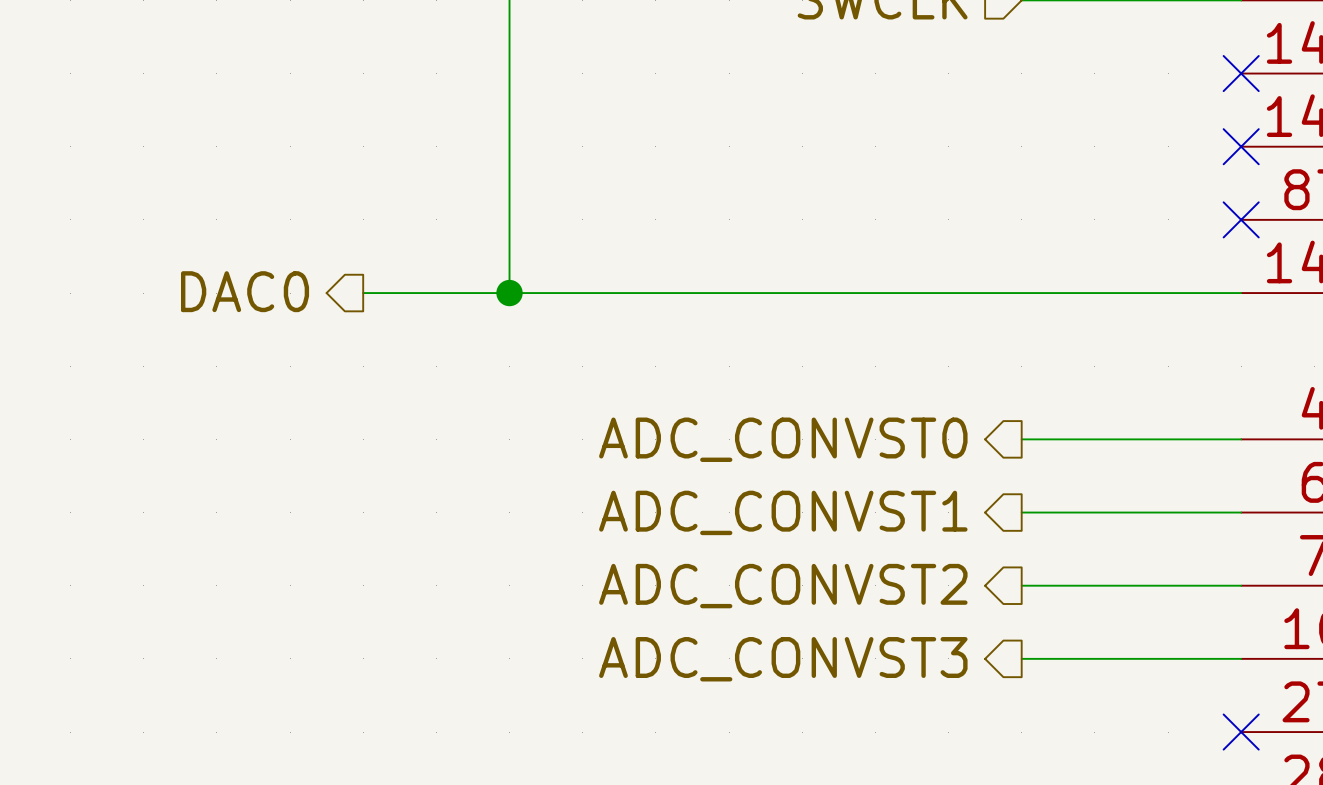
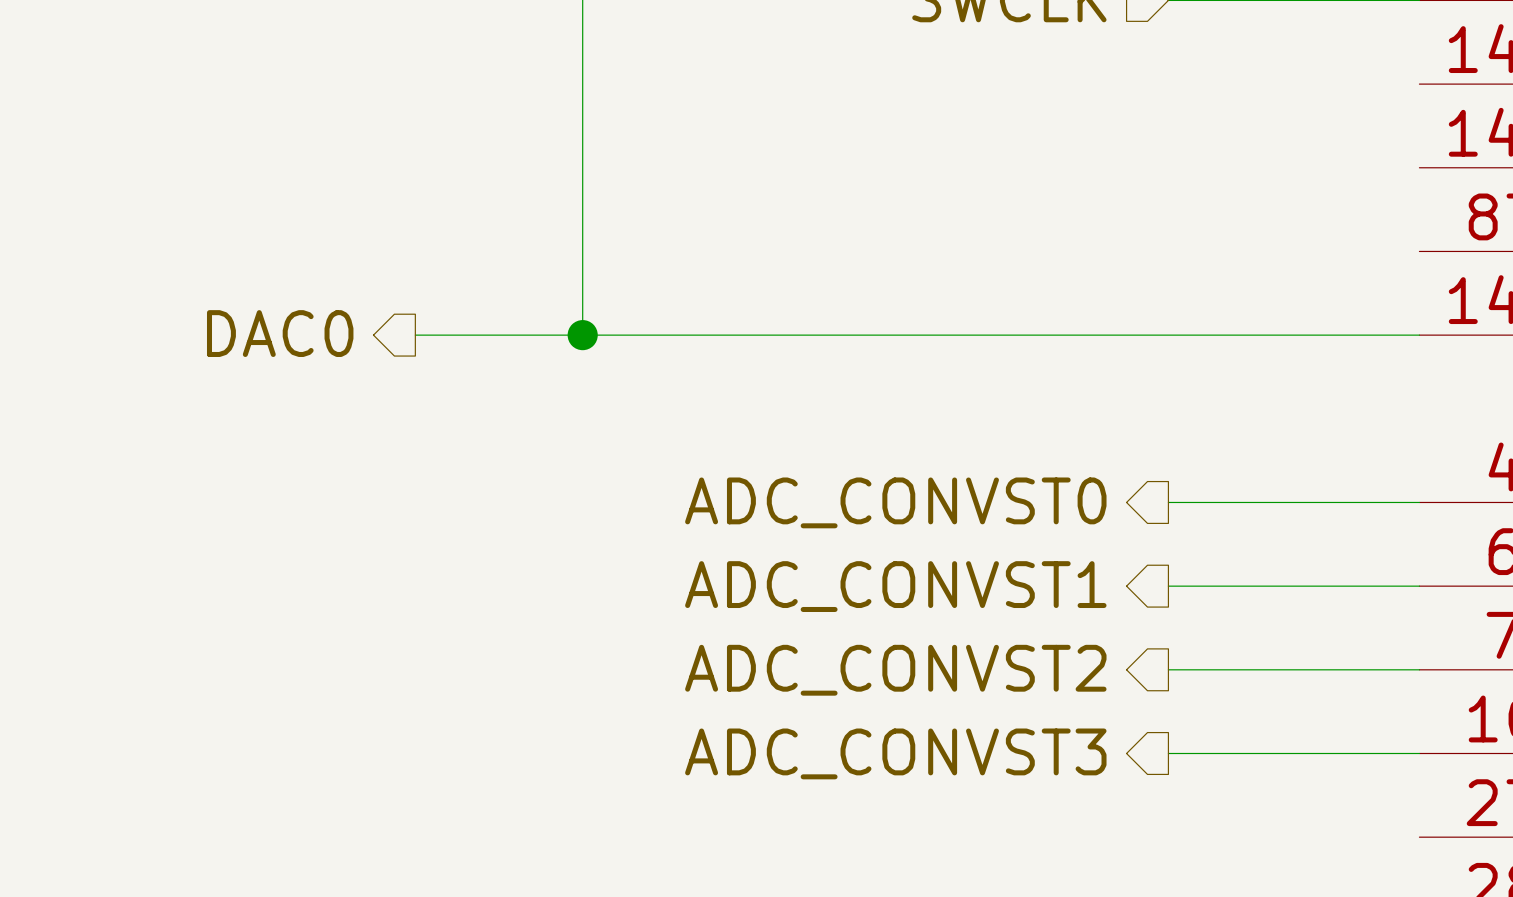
no-connect mark: (1241, 73) -> none
no-connect mark: (1241, 146) -> none
no-connect mark: (1241, 219) -> none
no-connect mark: (1241, 732) -> none

